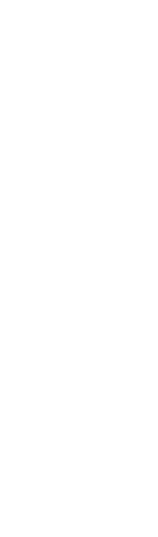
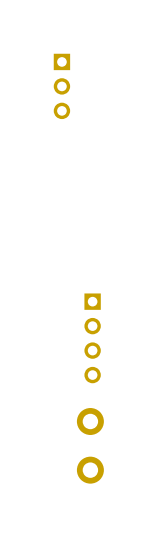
part: none -> (61, 86)
part: none -> (92, 338)
part: none -> (90, 421)
part: none -> (90, 470)

